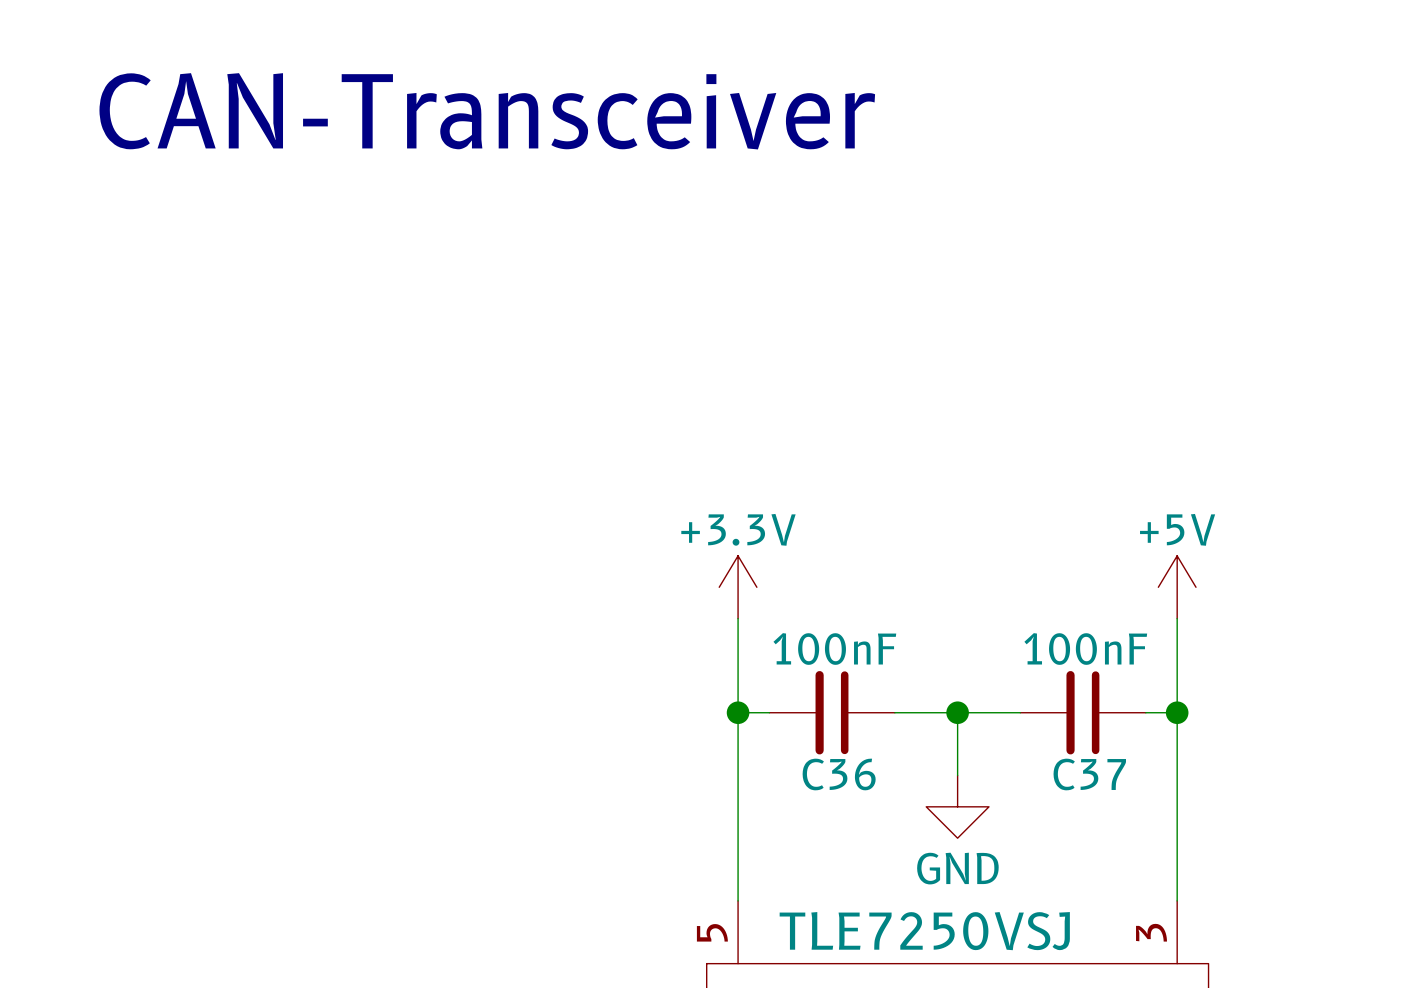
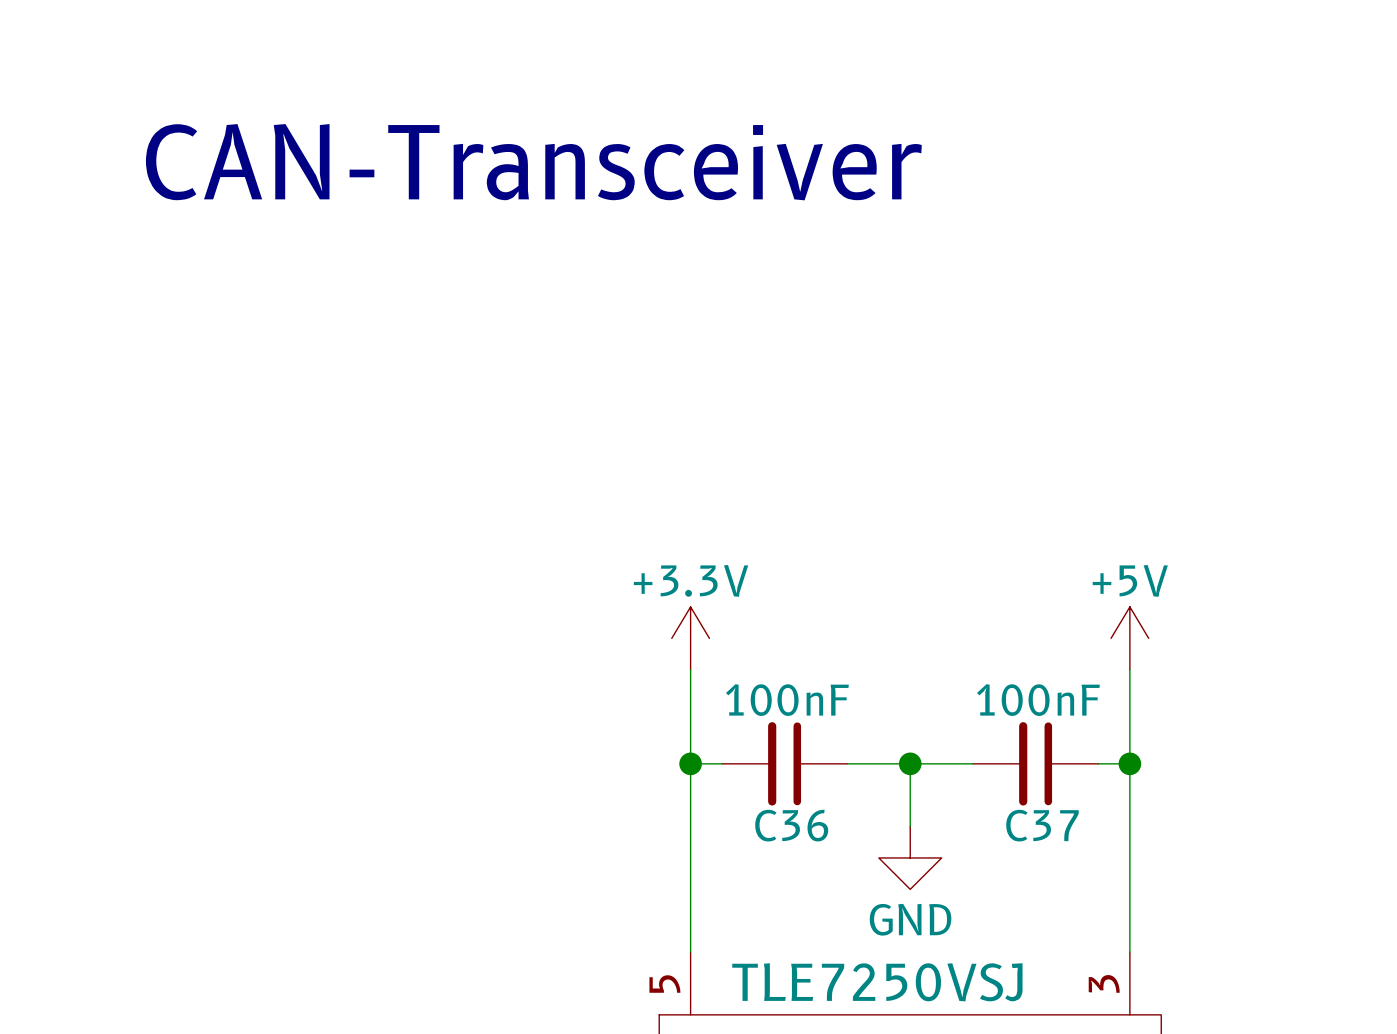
text position: CAN-Transceiver (487, 111) -> CAN-Transceiver (533, 162)

